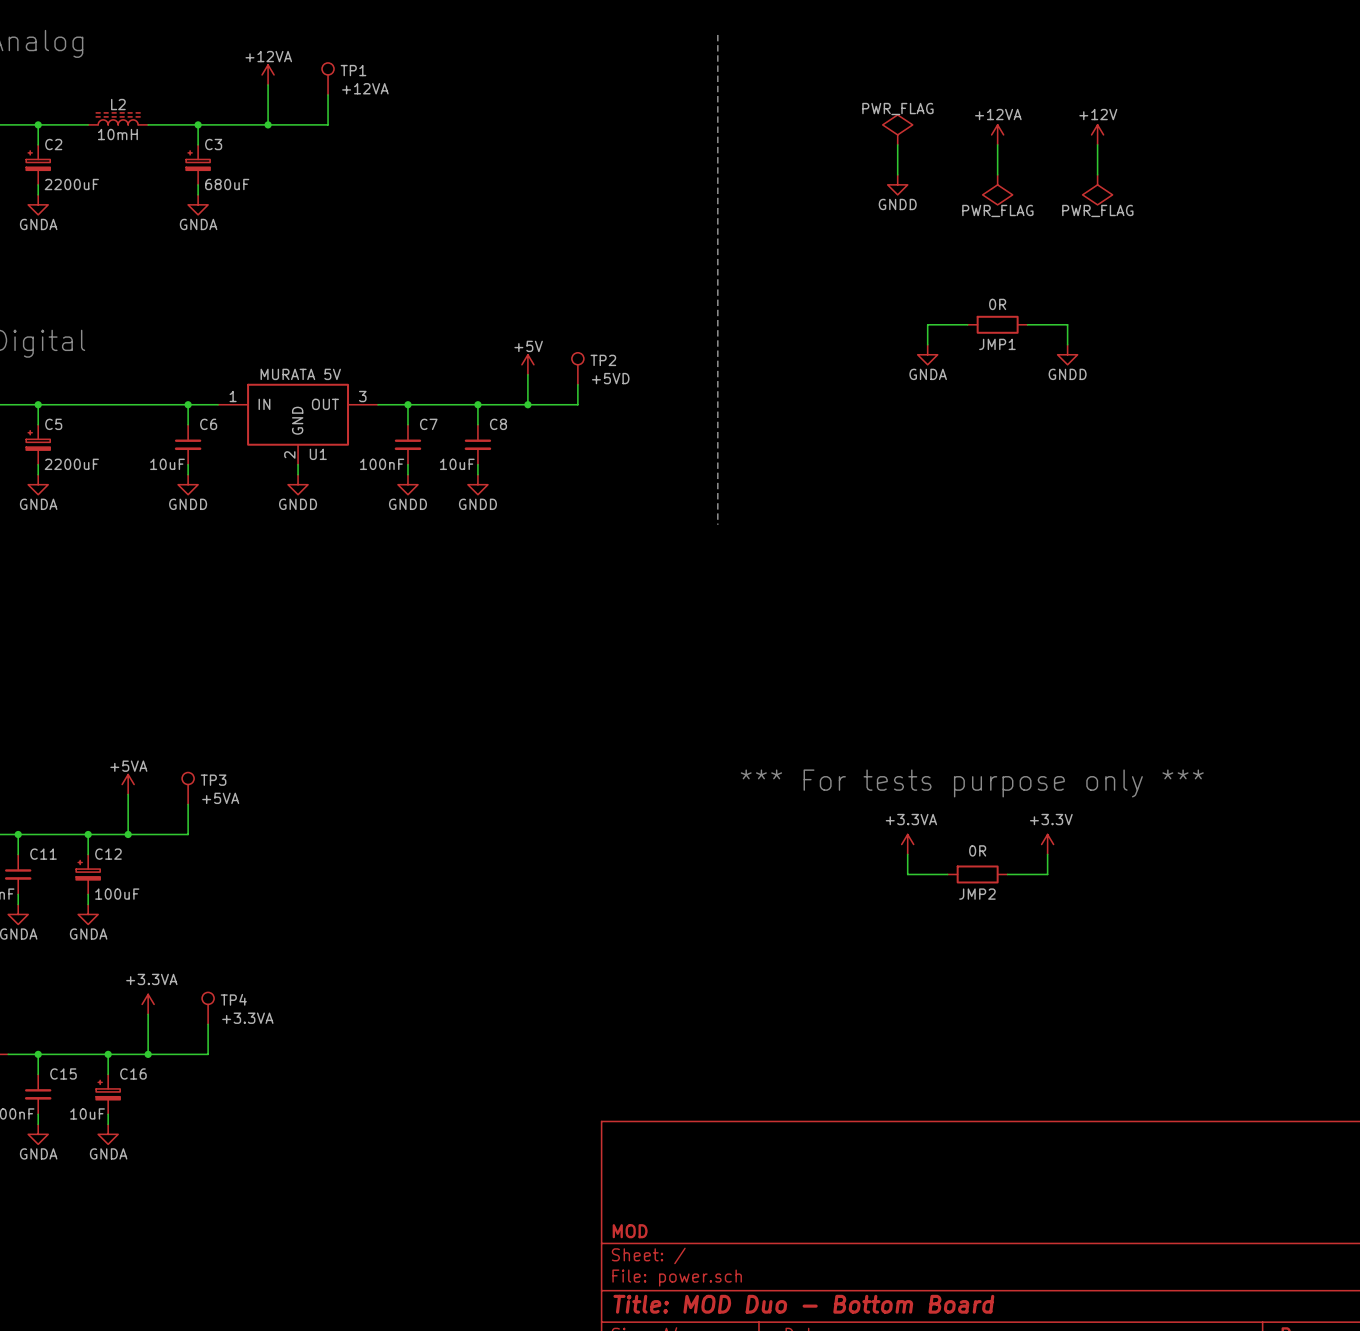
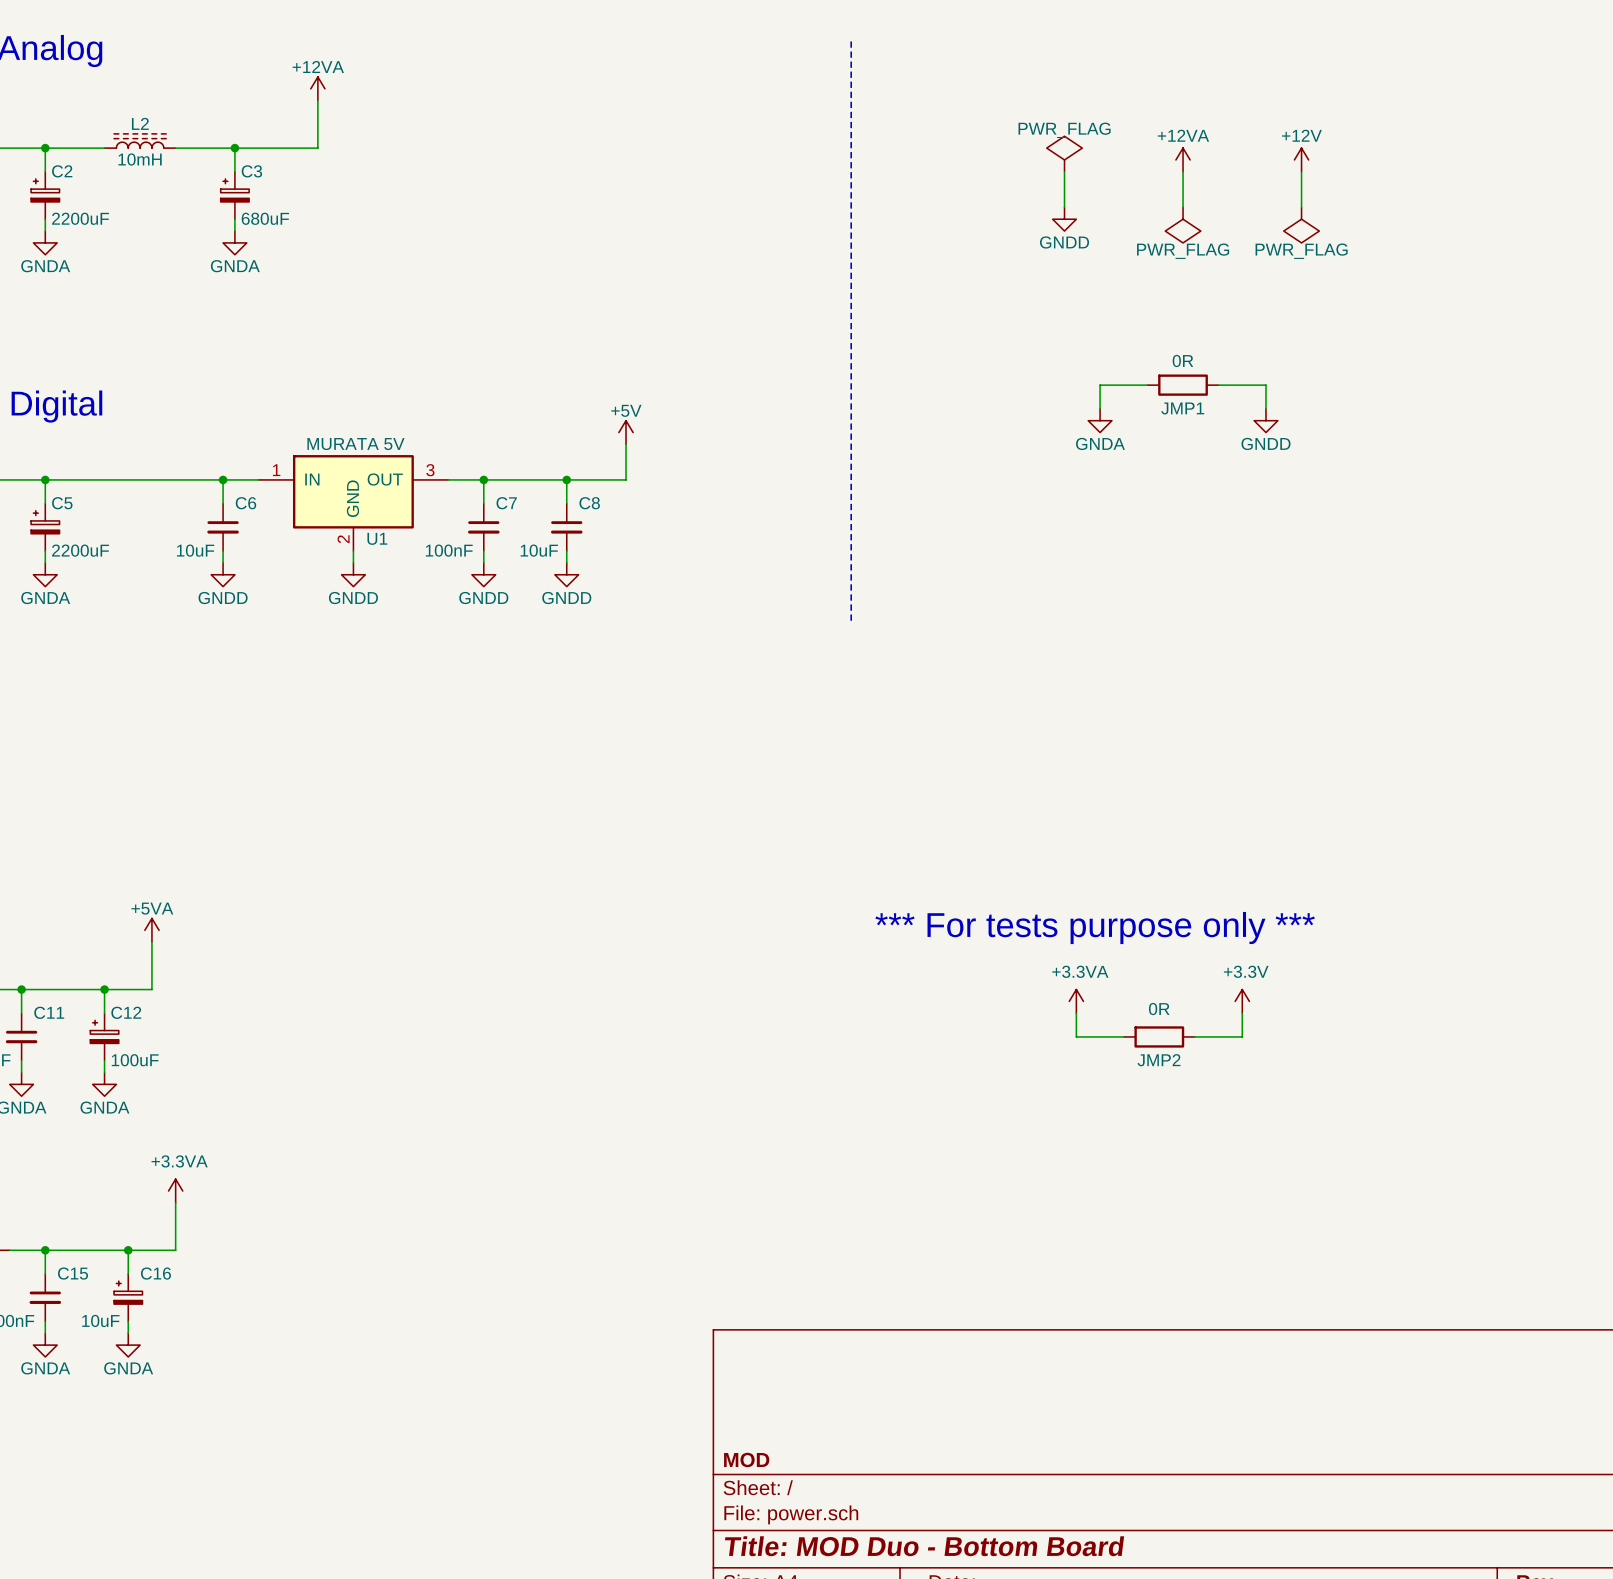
TP1: +12VA (328, 78) -> none
wire: (328, 94) (328, 124) (268, 124) -> none
junction: (268, 124) -> none
TP2: +5VD (577, 368) -> none
wire: (577, 384) (577, 404) (527, 404) -> none
junction: (527, 404) -> none
TP3: +5VA (188, 788) -> none
wire: (188, 804) (188, 834) (128, 834) -> none
junction: (128, 834) -> none
TP4: +3.3VA (208, 1008) -> none
wire: (208, 1024) (208, 1054) (148, 1054) -> none
junction: (148, 1054) -> none

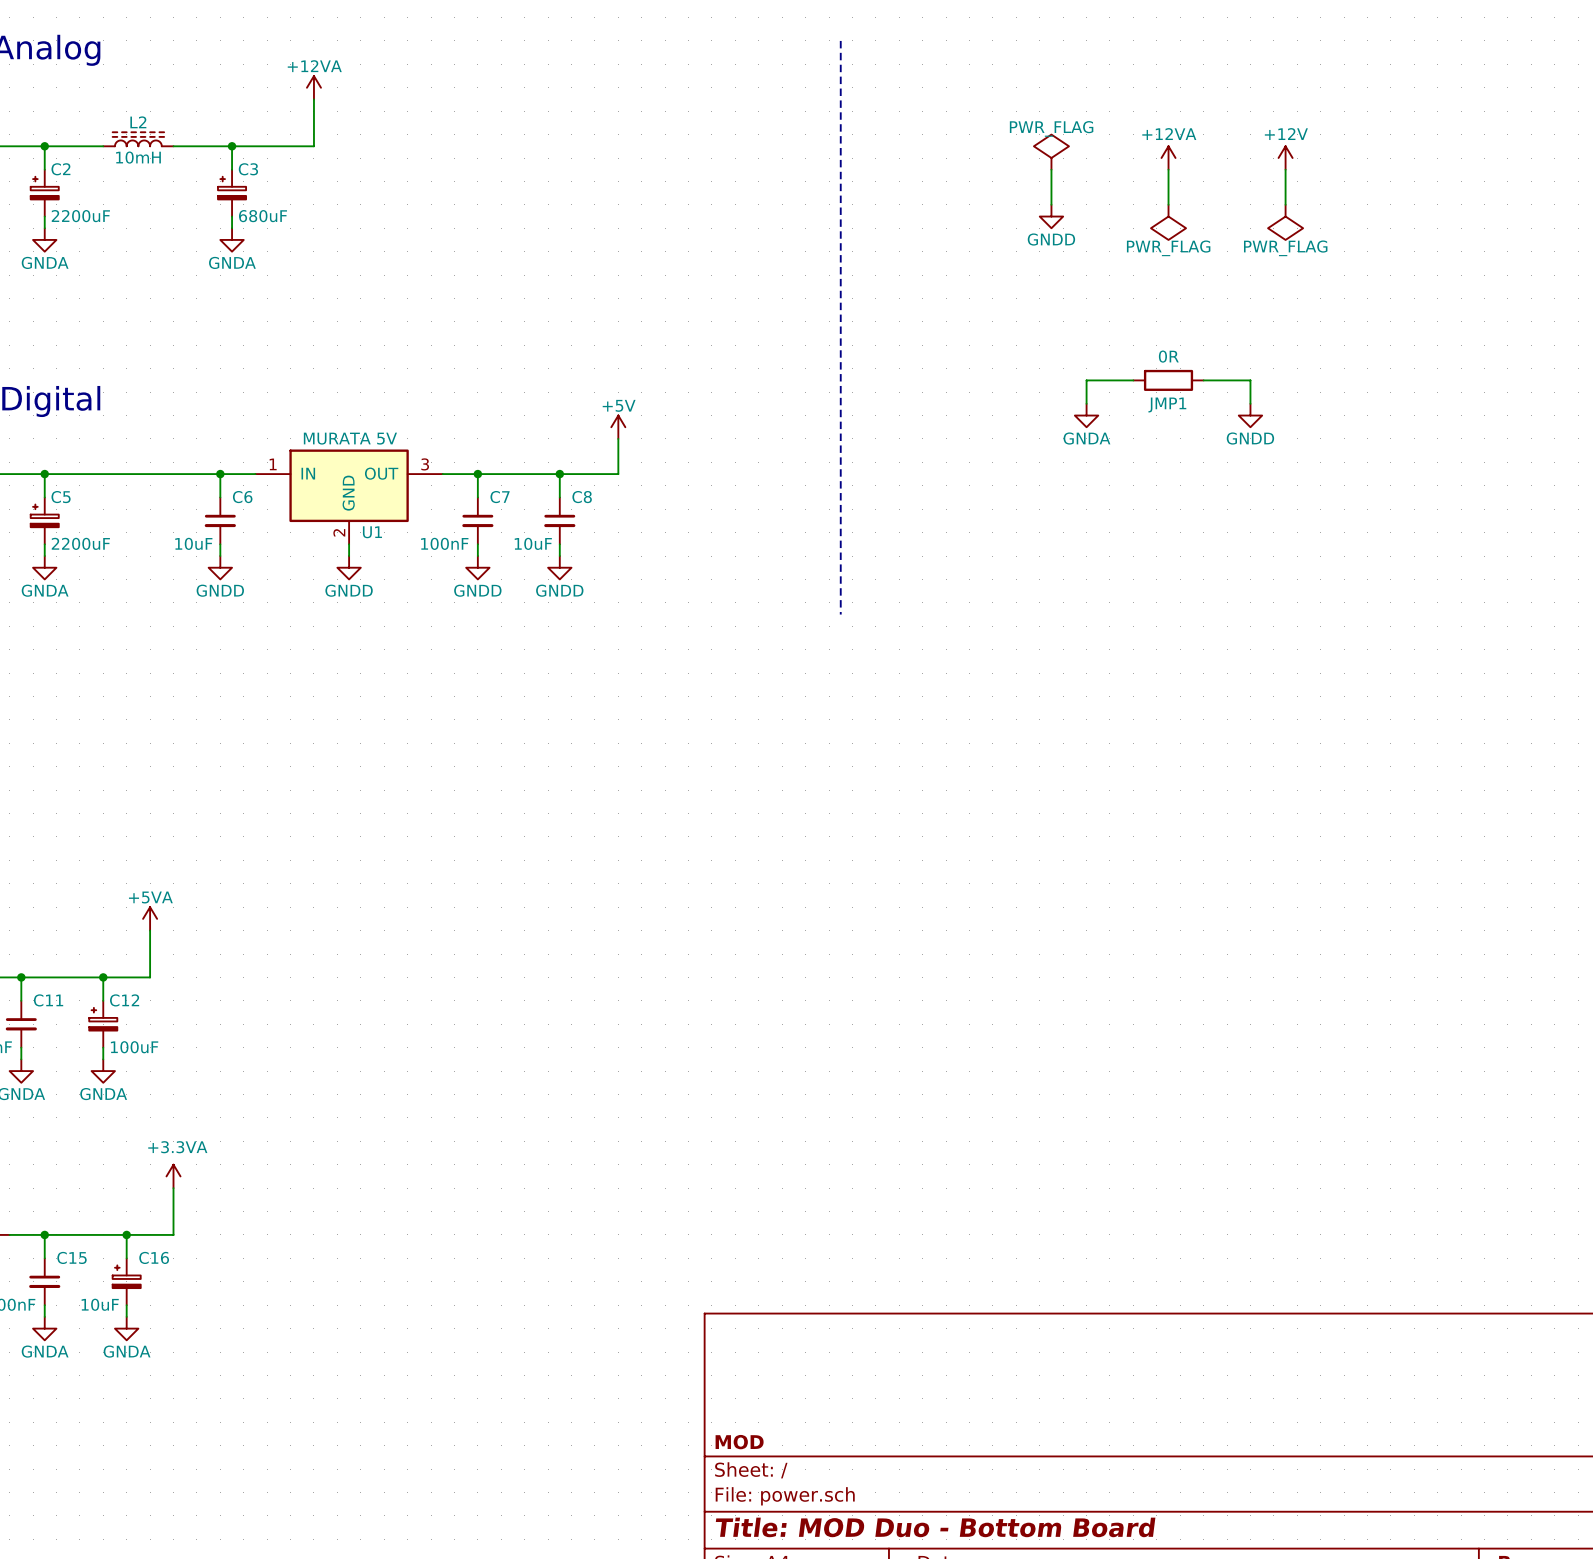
text: *** For tests purpose only *** (1095, 928) -> none
power symbol: +3.3VA (1076, 1001) -> none
power symbol: +3.3V (1242, 1001) -> none
wire: (1076, 1013) (1076, 1036) (1123, 1036) -> none
wire: (1242, 1013) (1242, 1036) (1194, 1036) -> none
JMP2: 0R (1159, 1036) -> none

